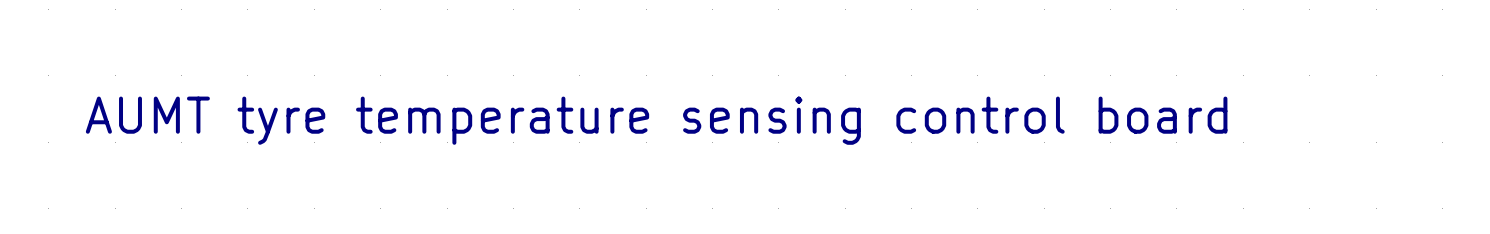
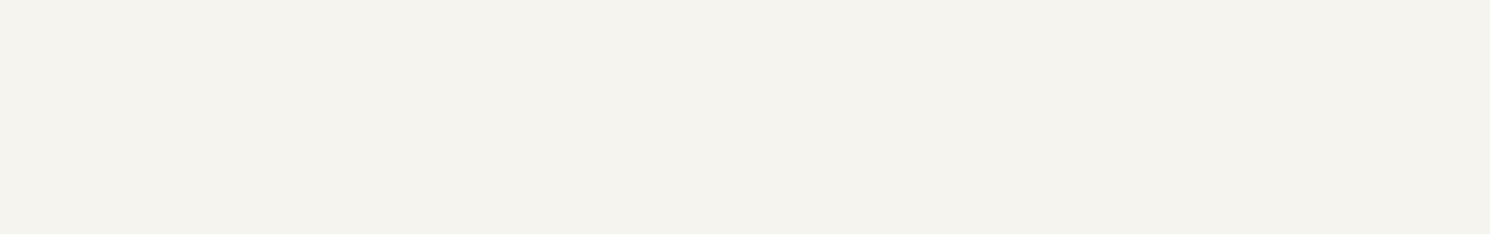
text: AUMT tyre temperature sensing control board (656, 120) -> none

